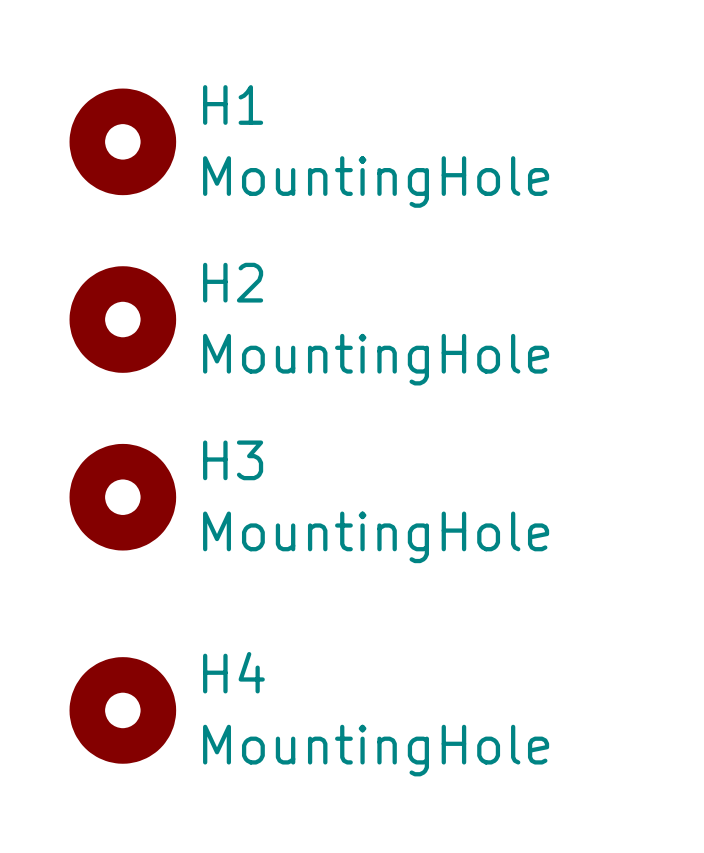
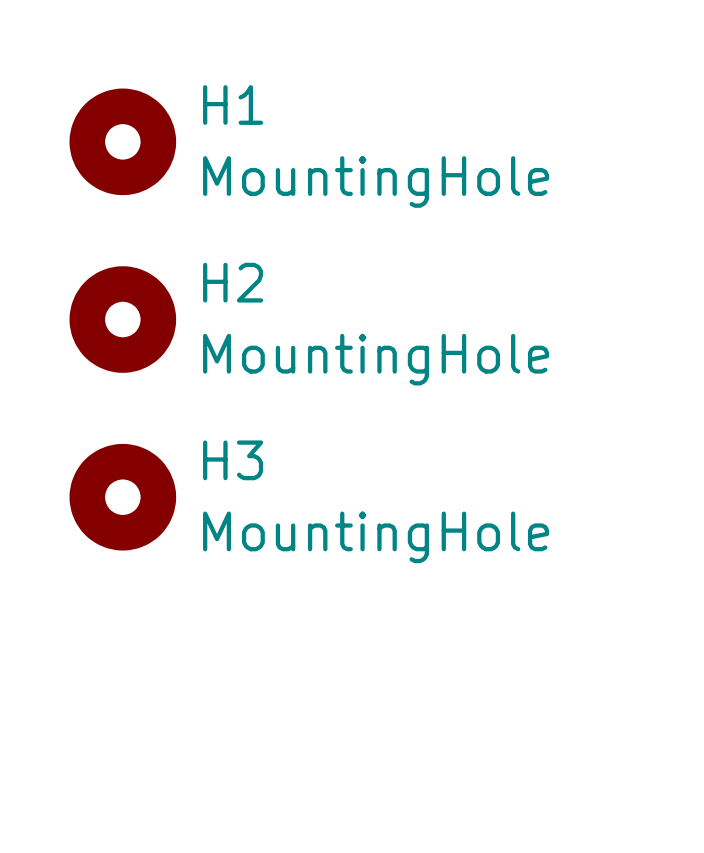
H4: MountingHole (122, 710) -> none

